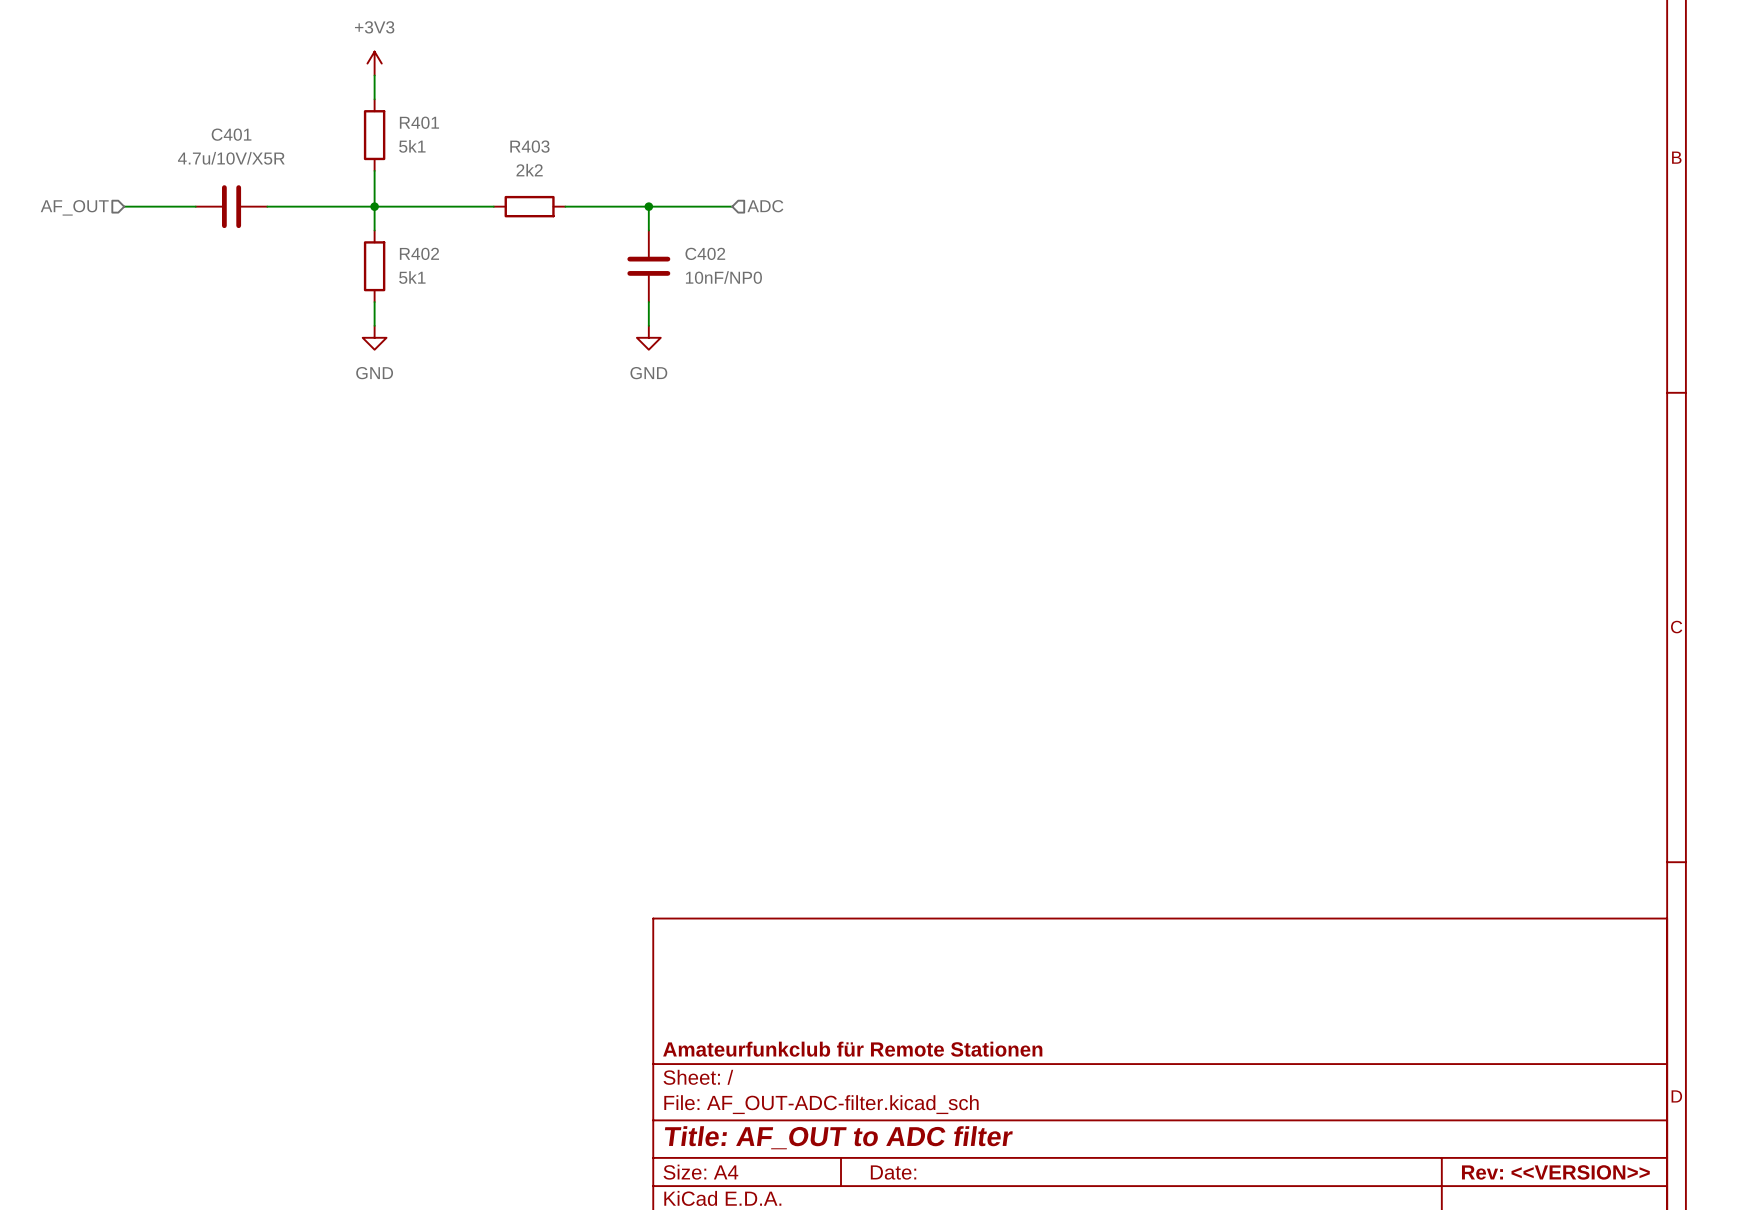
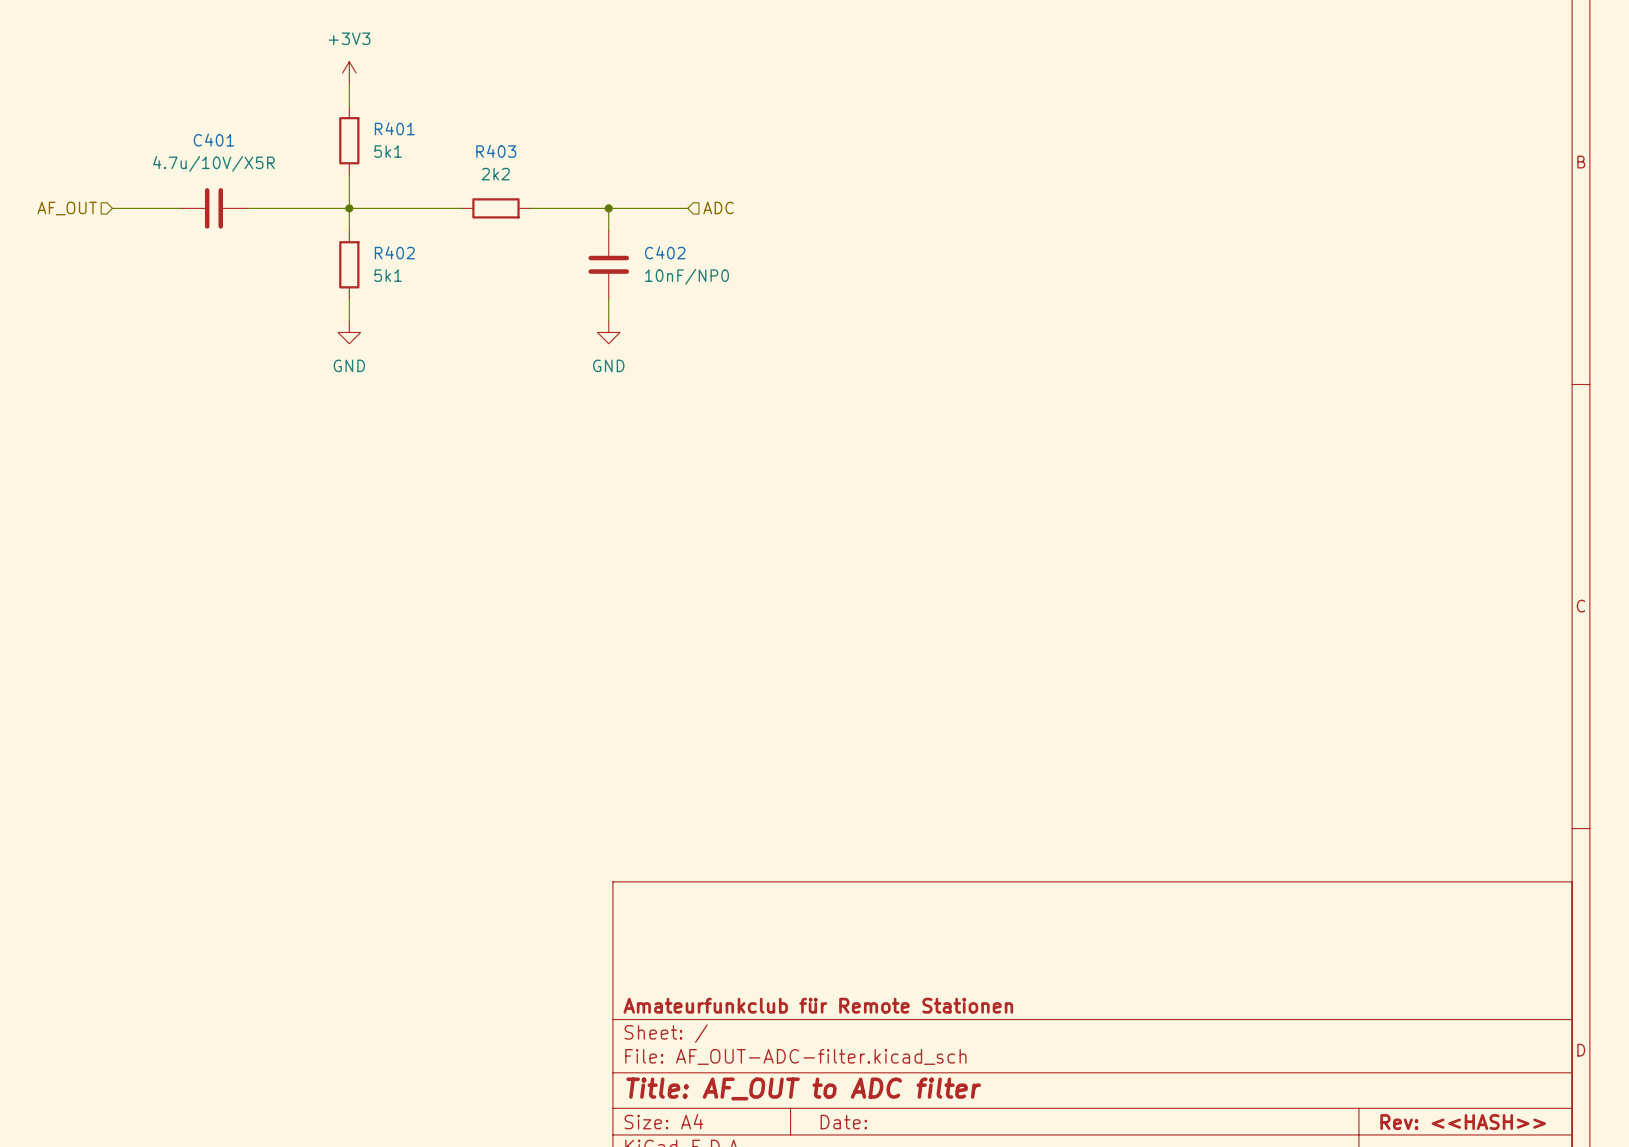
title block: Rev: <<VERSION>> (1555, 1172) -> Rev: <<HASH>> (1463, 1122)

